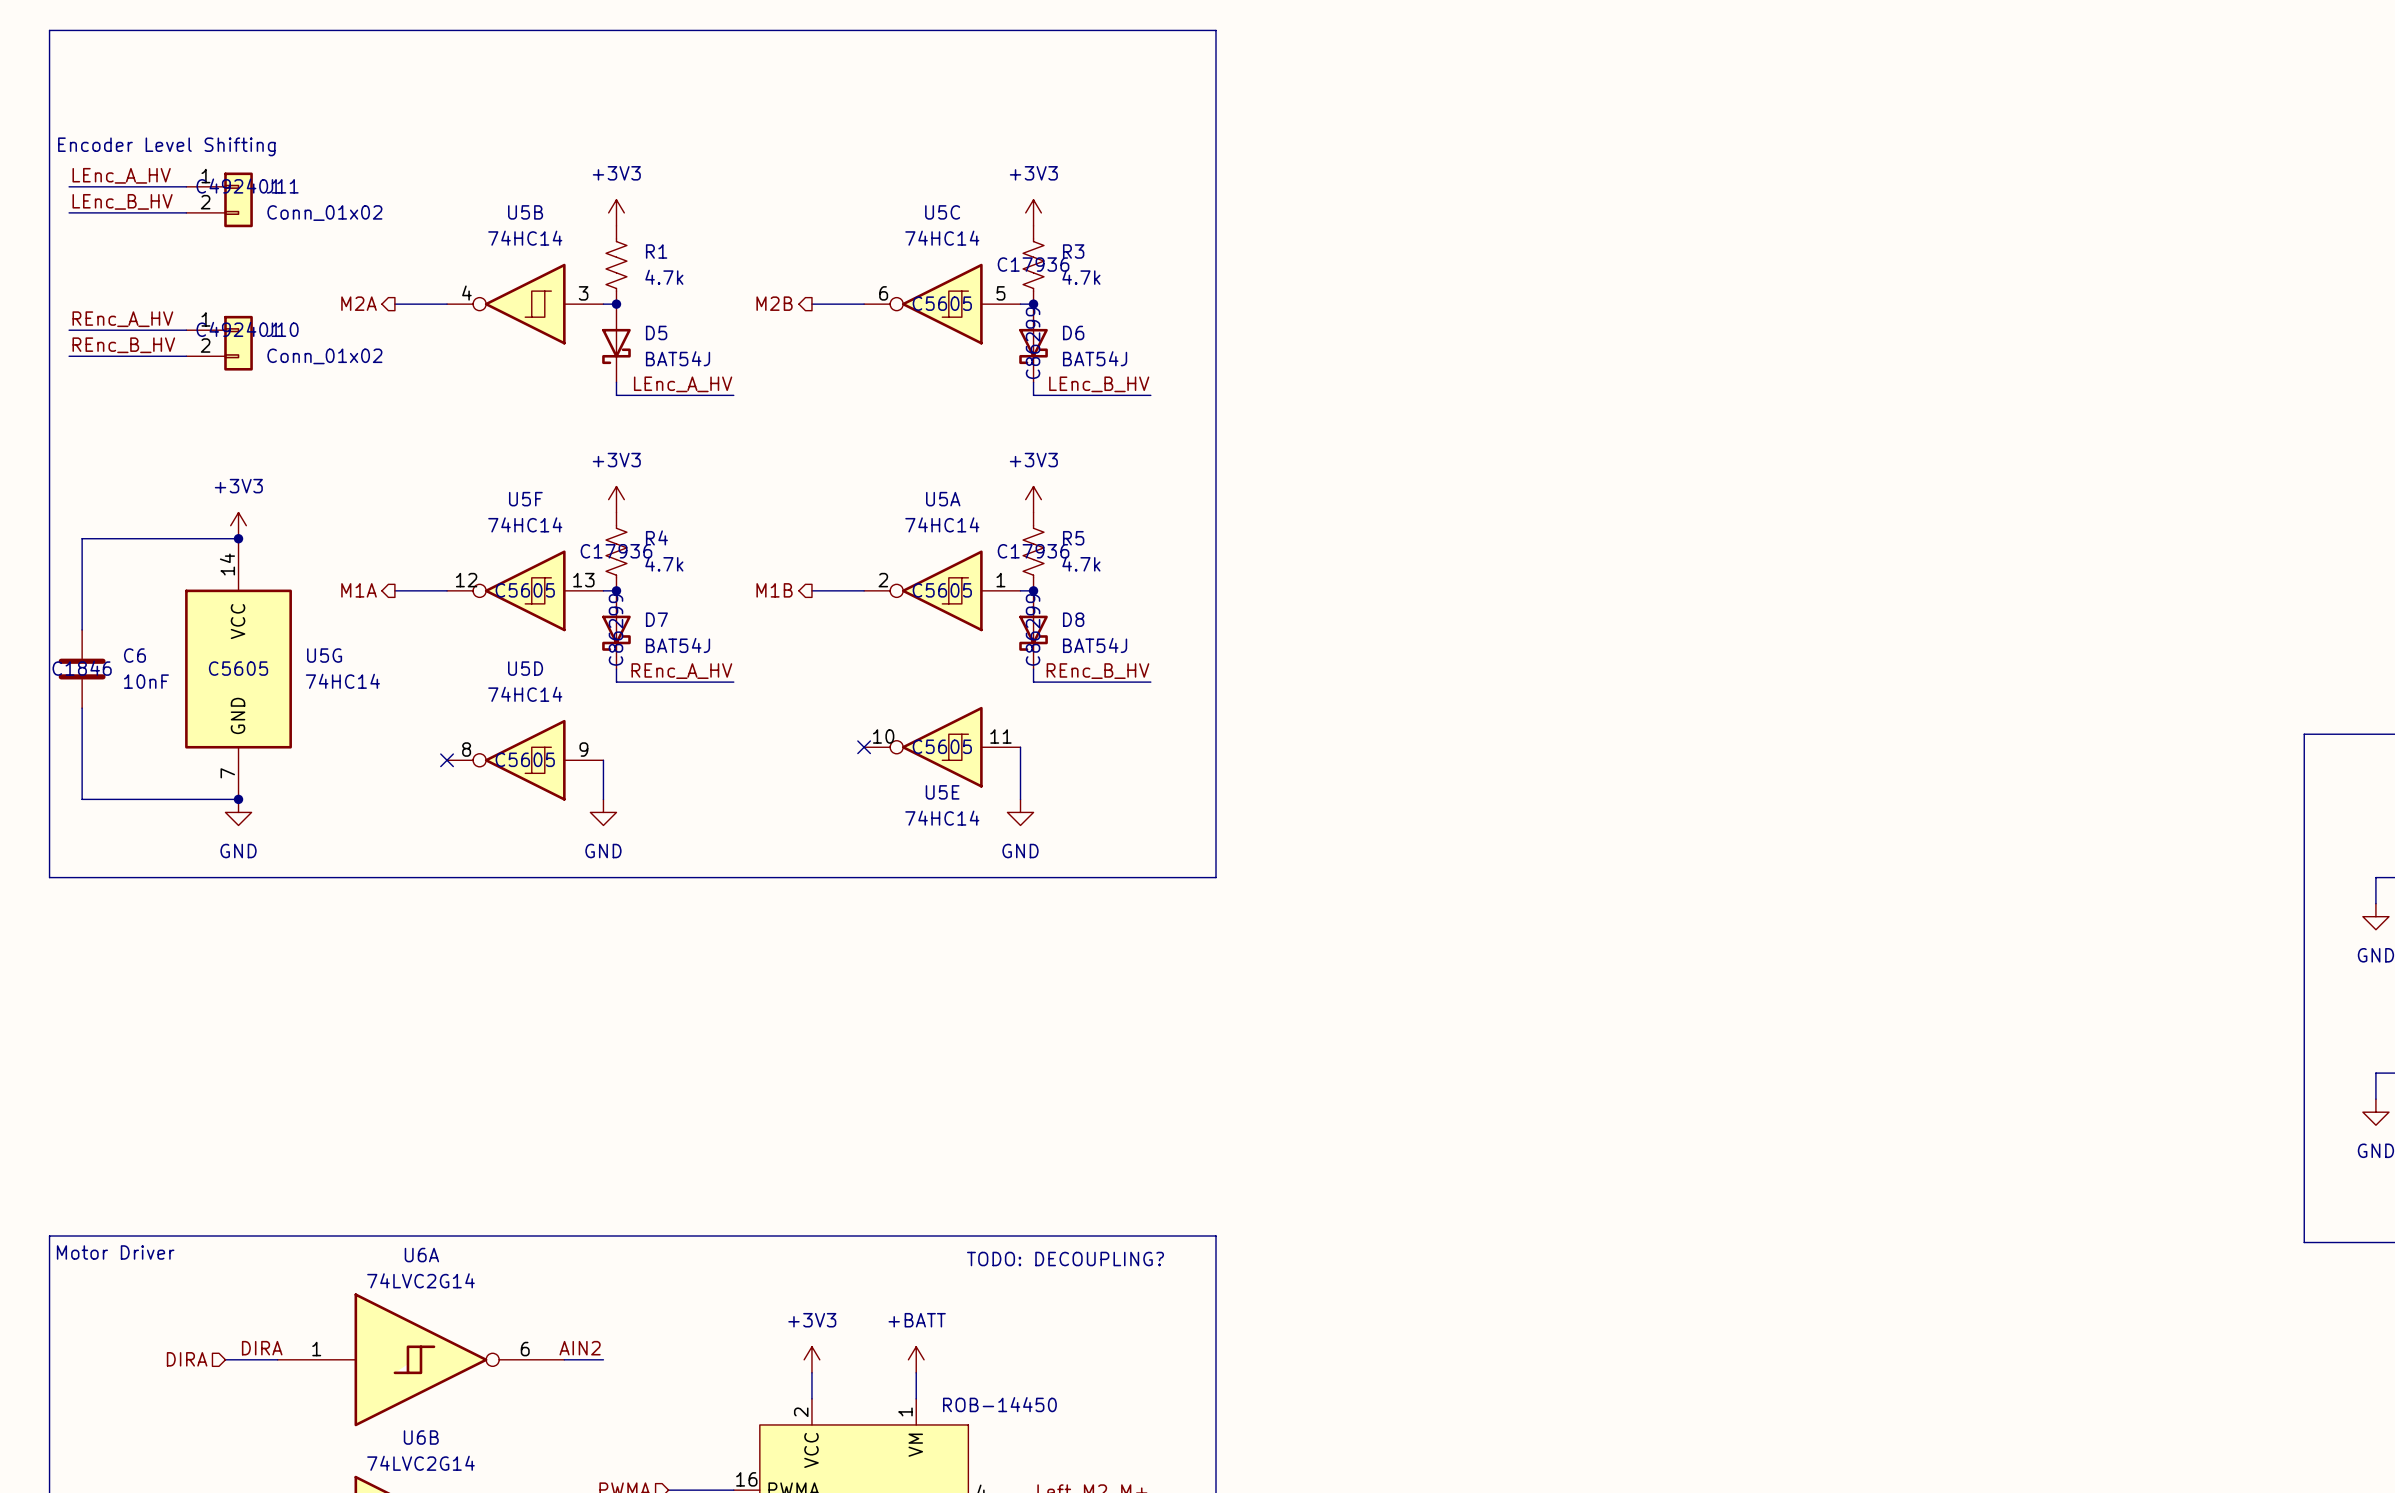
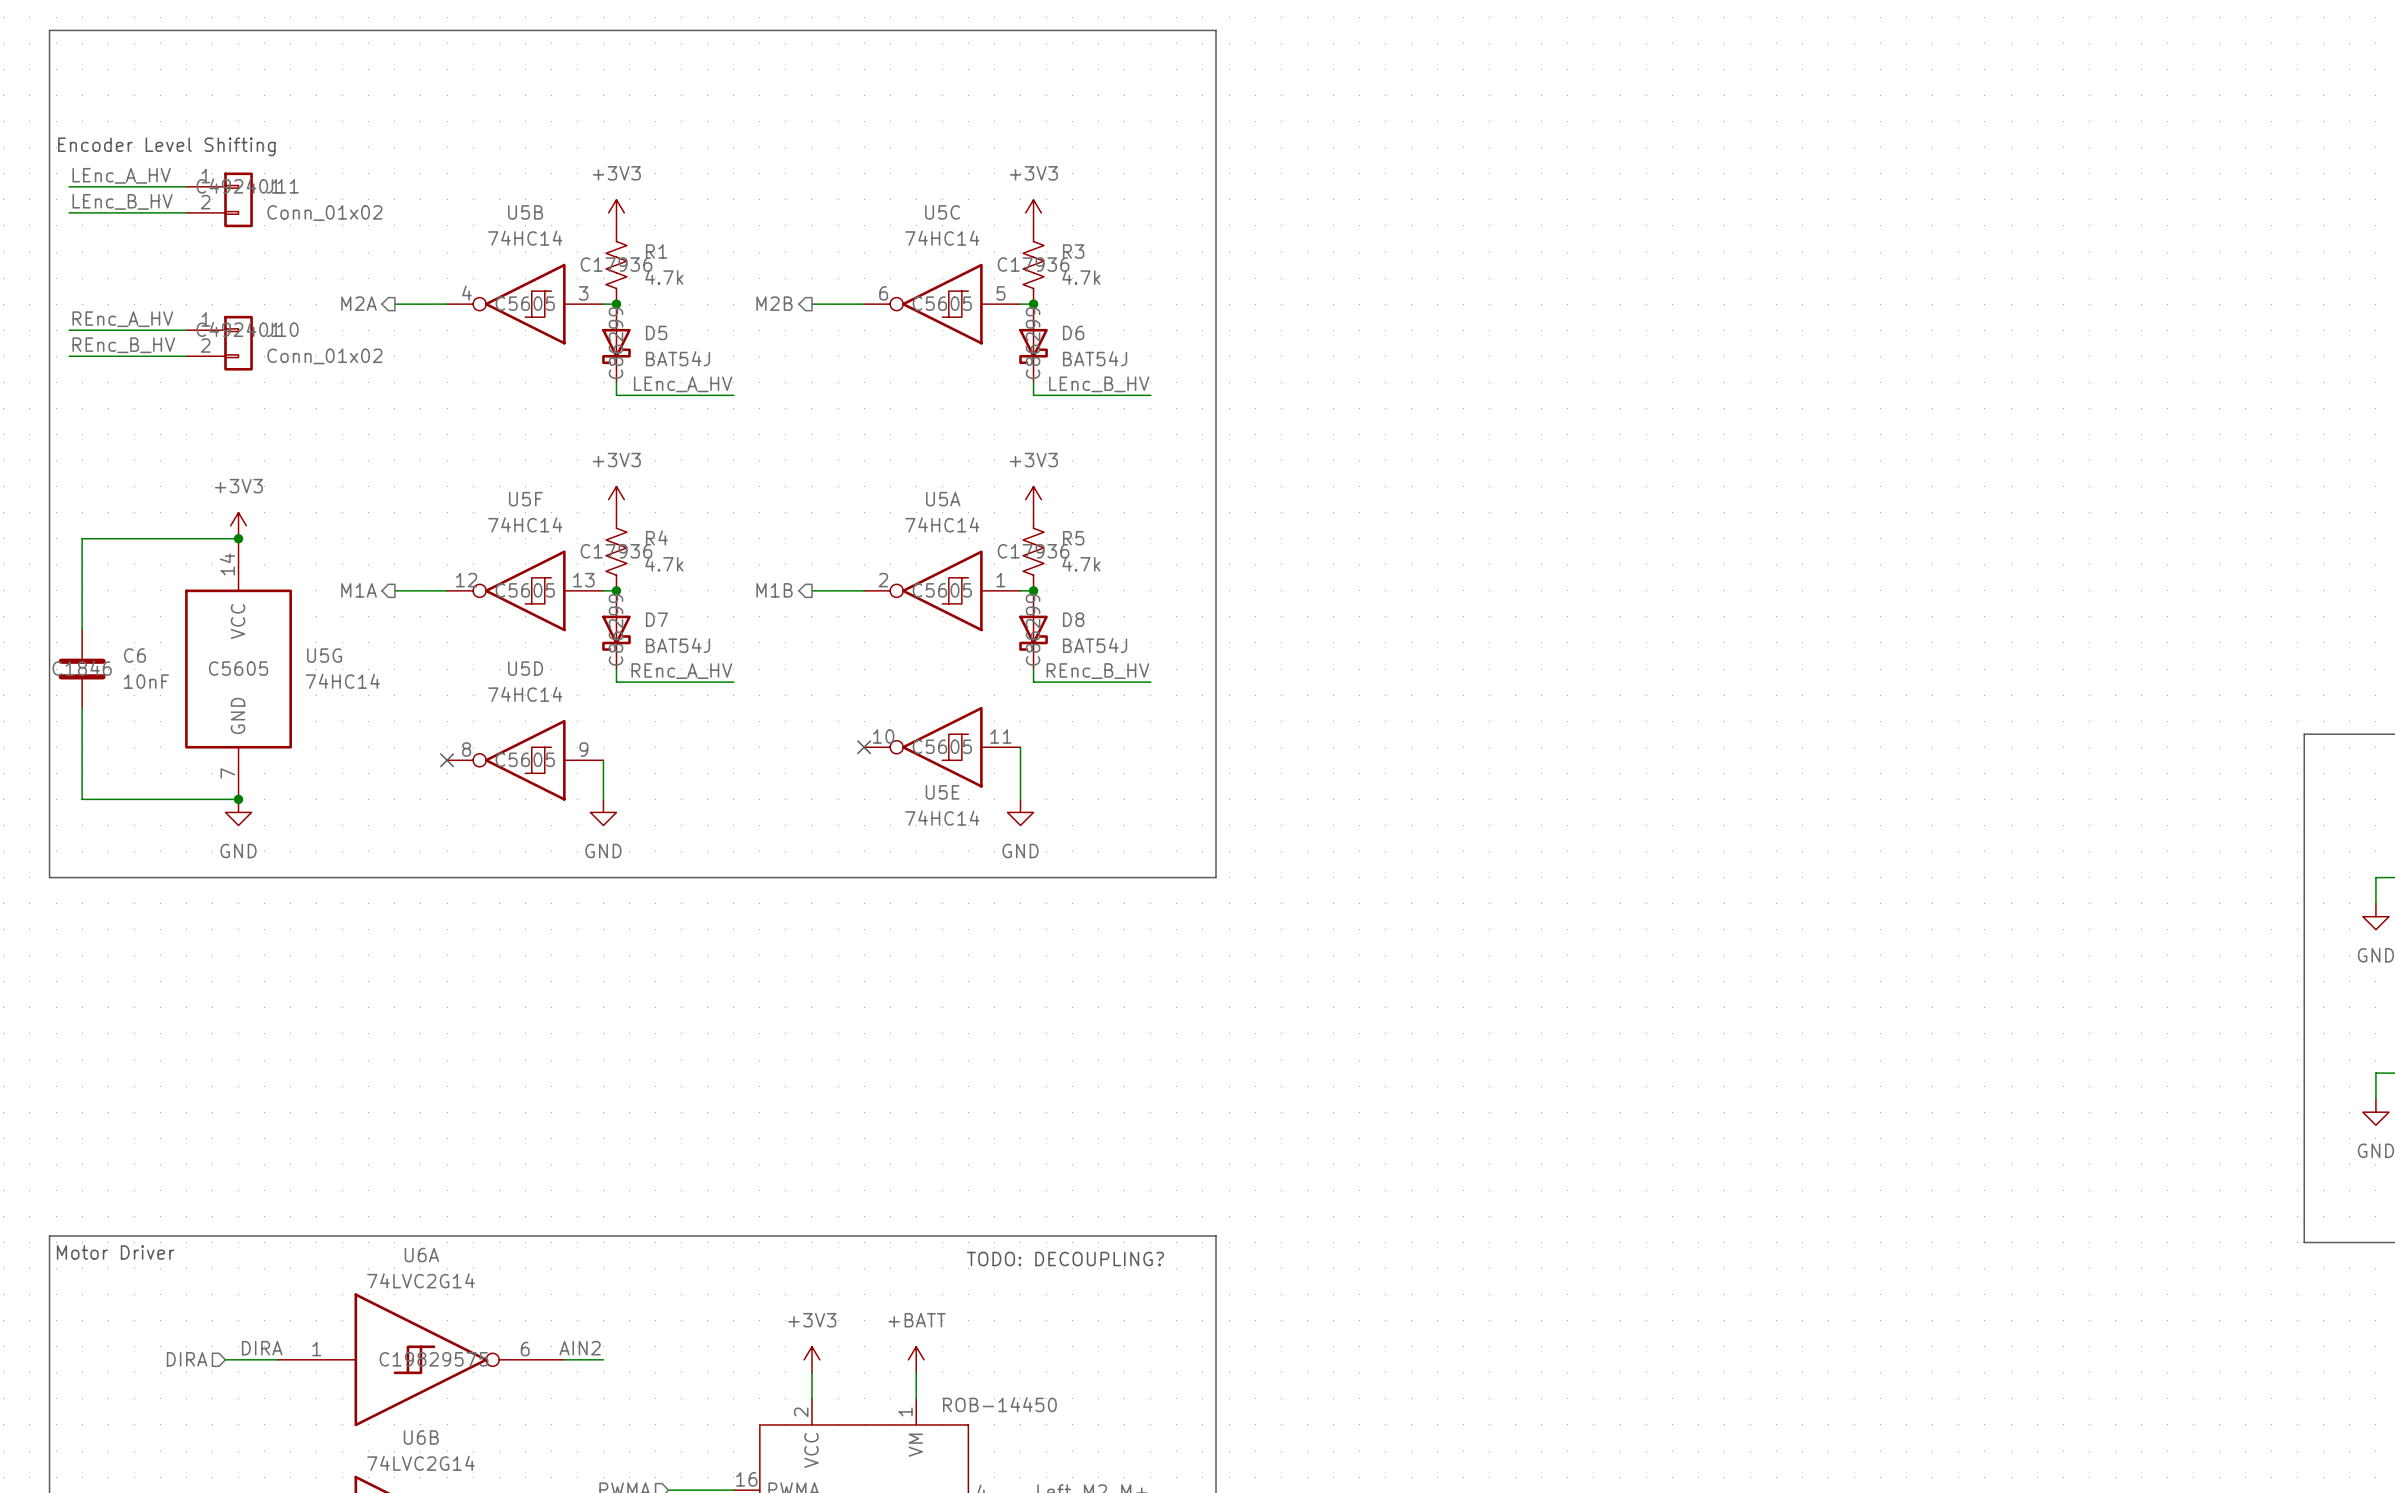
R1 text: none -> C17936 (616, 264)
U5B text: none -> C5605 (525, 303)
D5 text: none -> C86299 (615, 343)
U6A text: none -> C19829575 (434, 1359)

